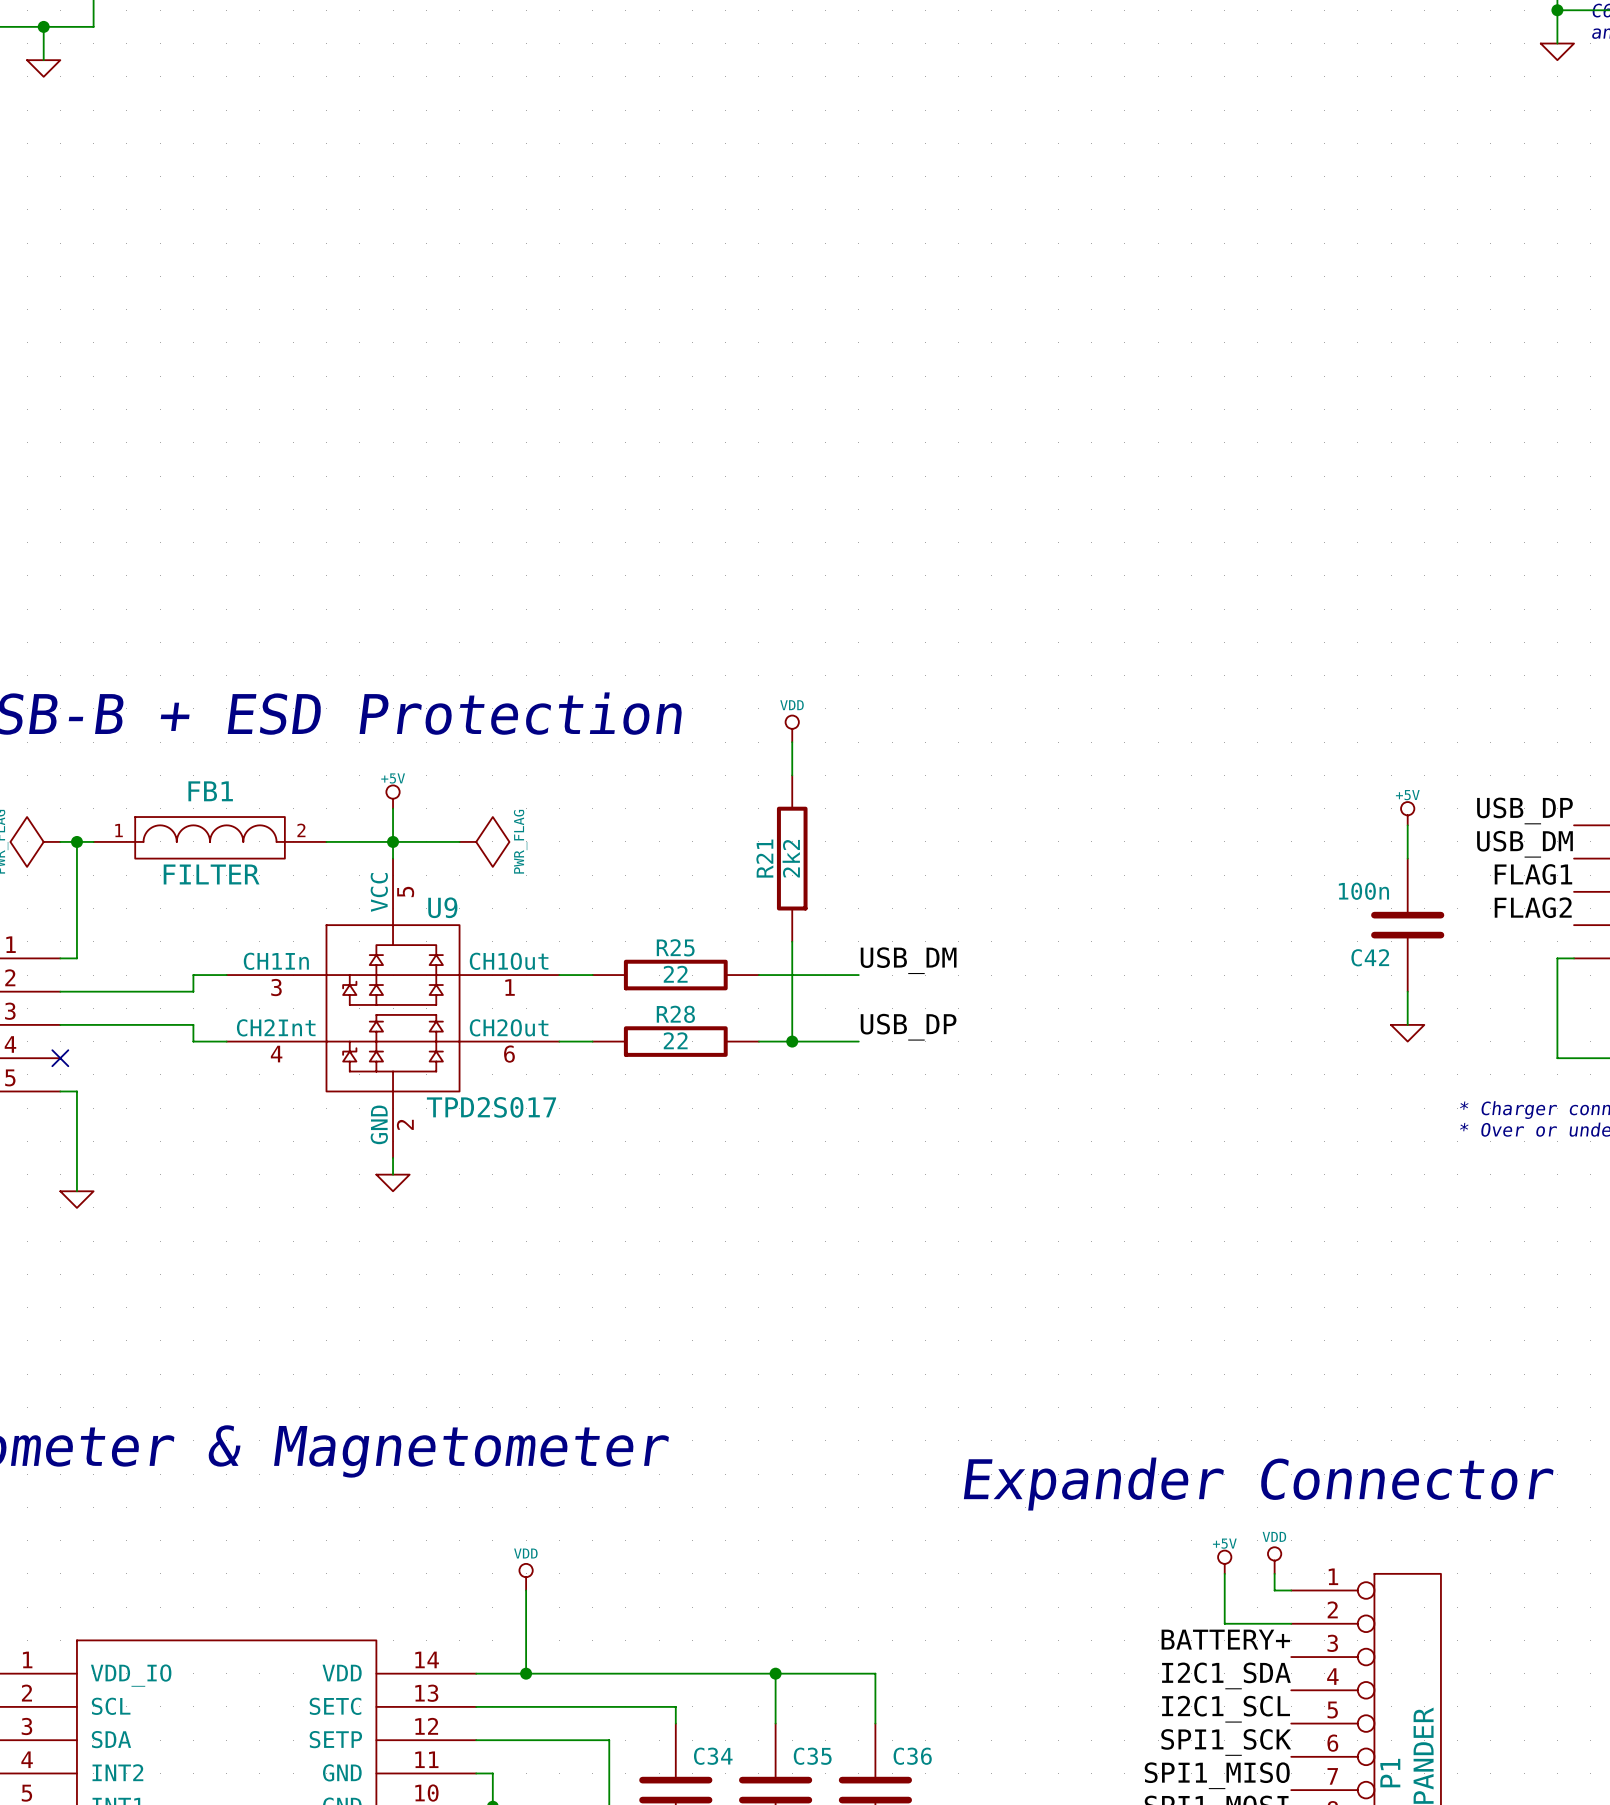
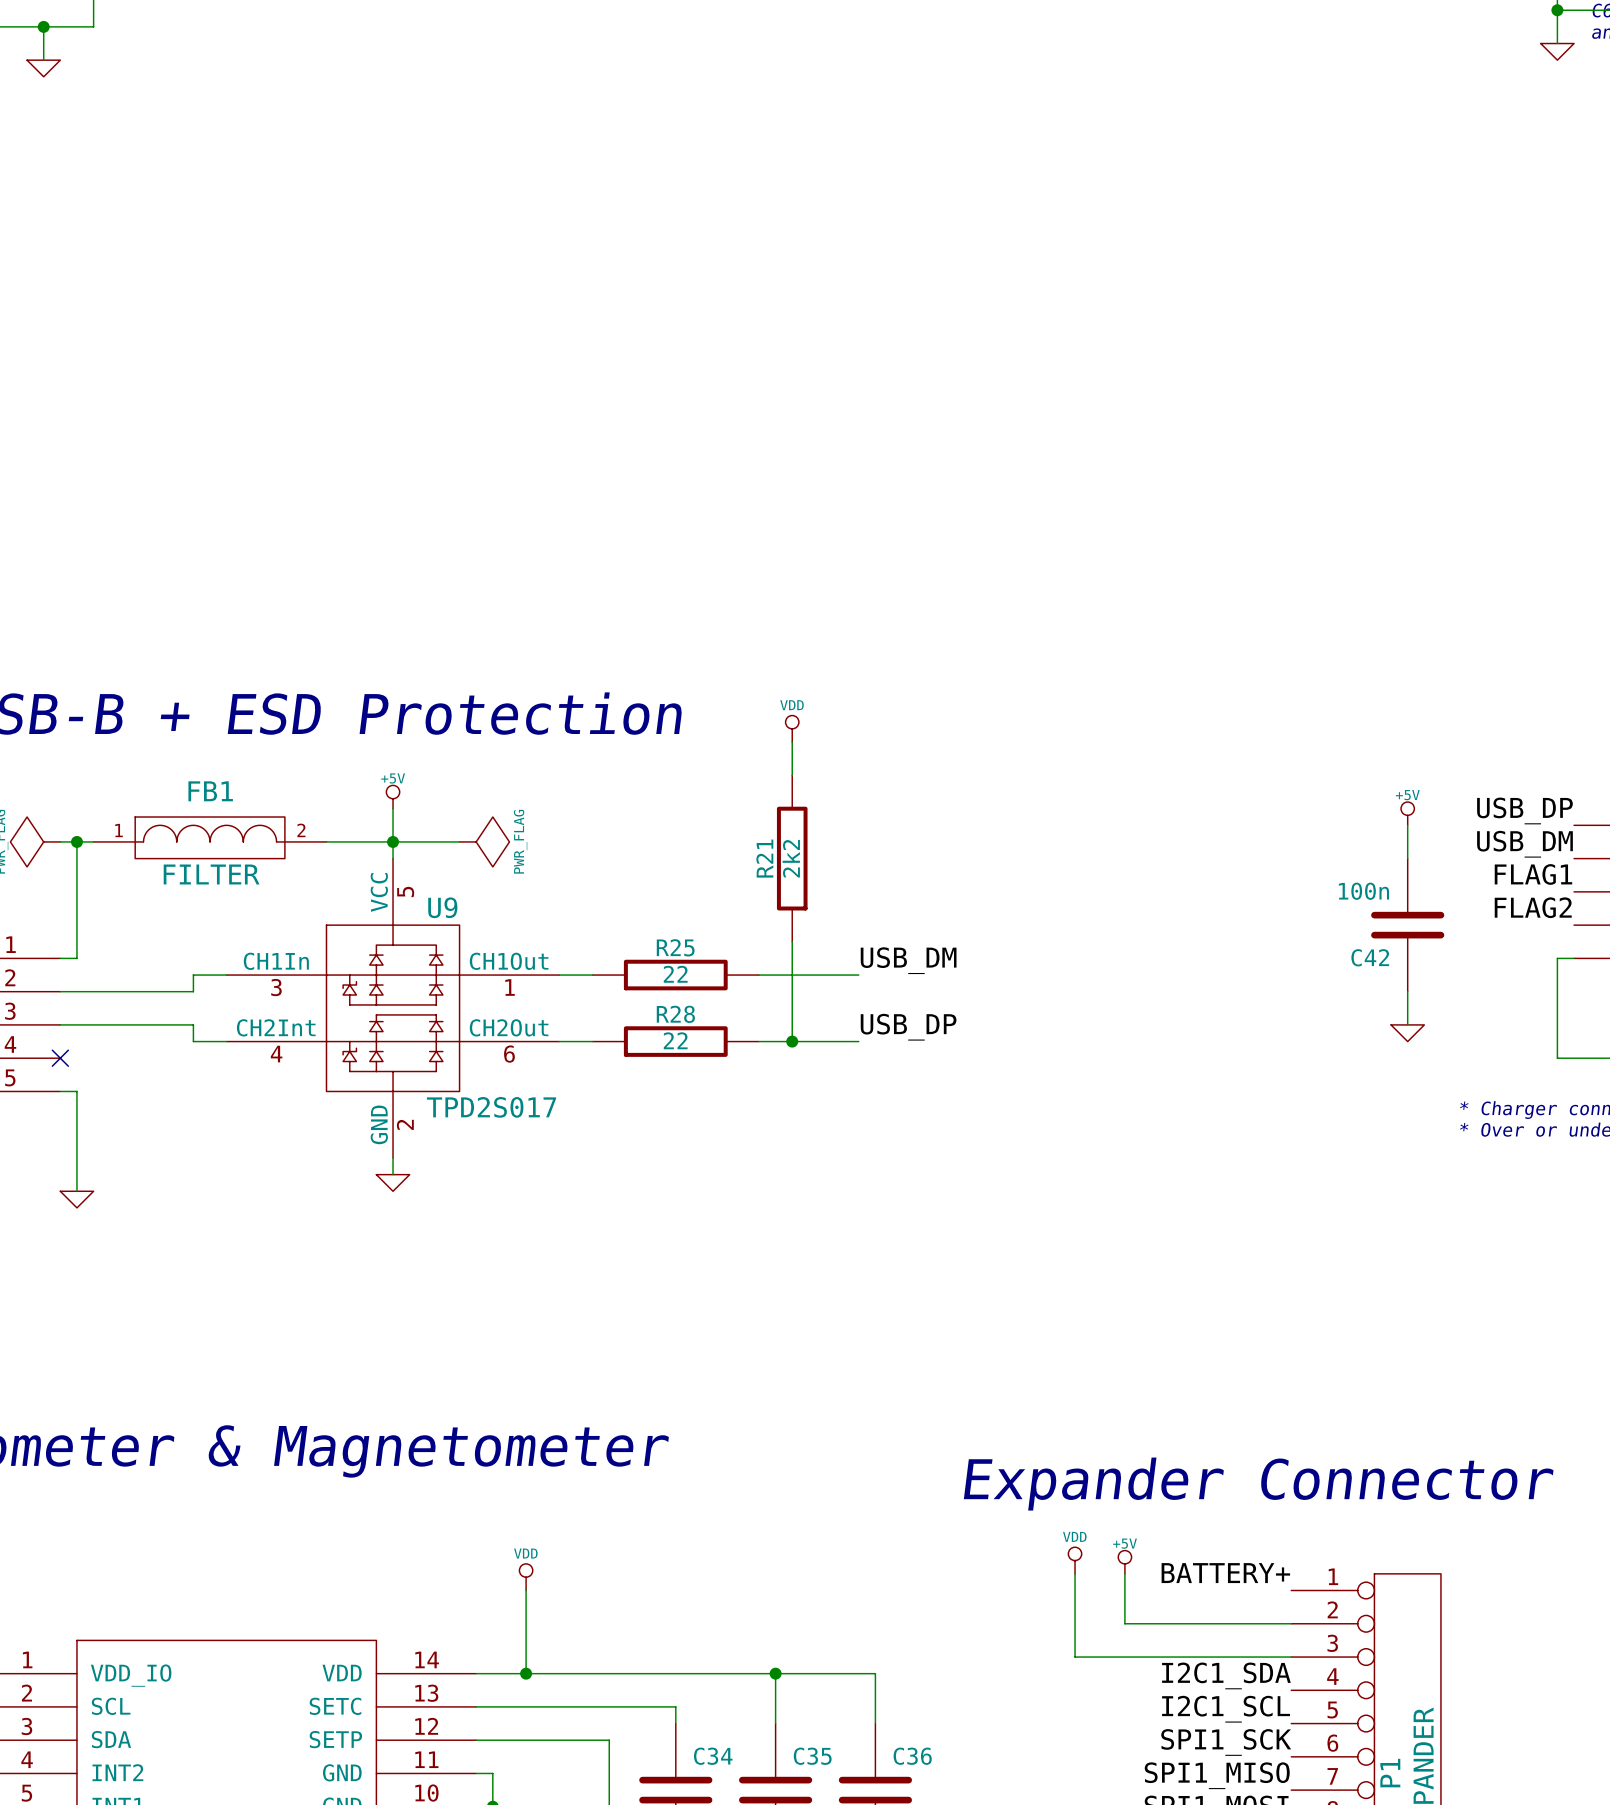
power symbol position: VDD (1274, 1560) -> VDD (1075, 1560)
power symbol position: +5V (1224, 1562) -> +5V (1124, 1562)
wire: none -> (1075, 1573) (1075, 1657) (1291, 1657)
wire: (1224, 1573) (1224, 1623) -> (1124, 1573) (1124, 1623) (1224, 1623)
wire: (1274, 1573) (1274, 1590) (1291, 1590) -> none
label position: BATTERY+ (1225, 1639) -> BATTERY+ (1225, 1573)

